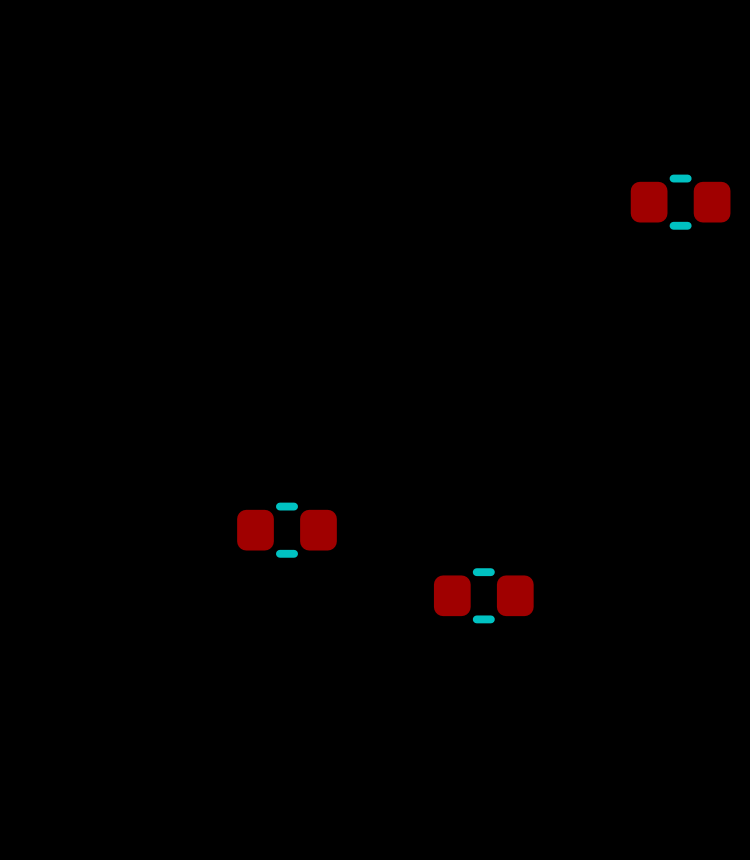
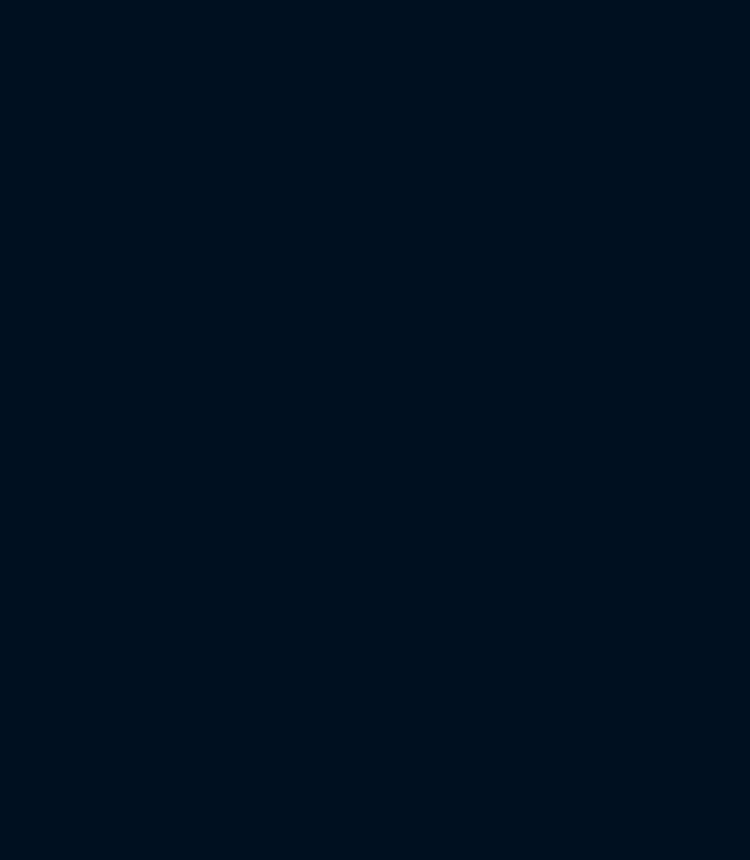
part: (680, 202) -> none
part: (286, 530) -> none
part: (483, 595) -> none

